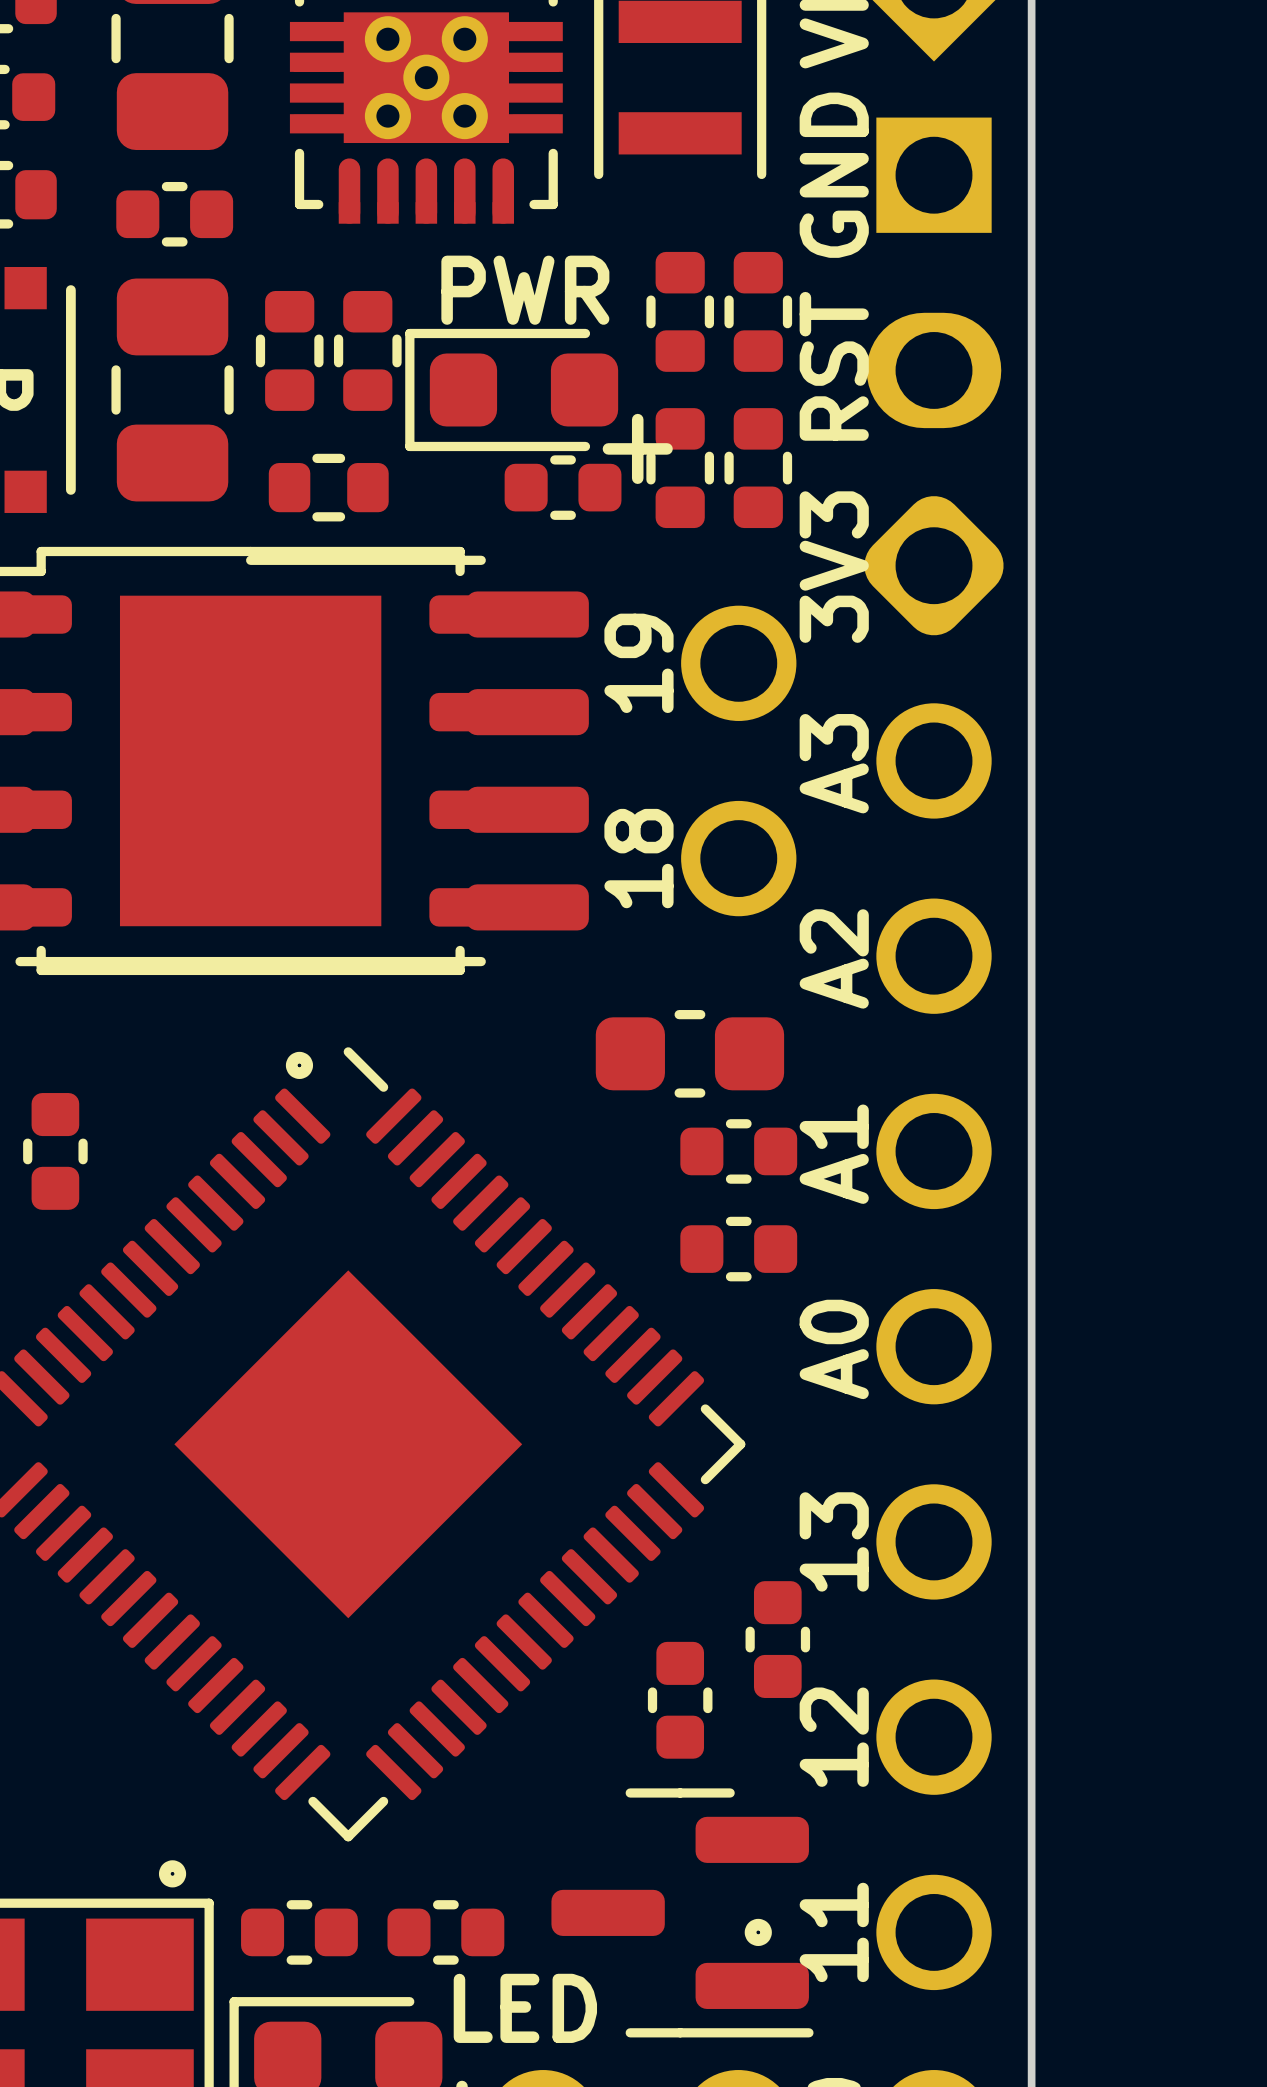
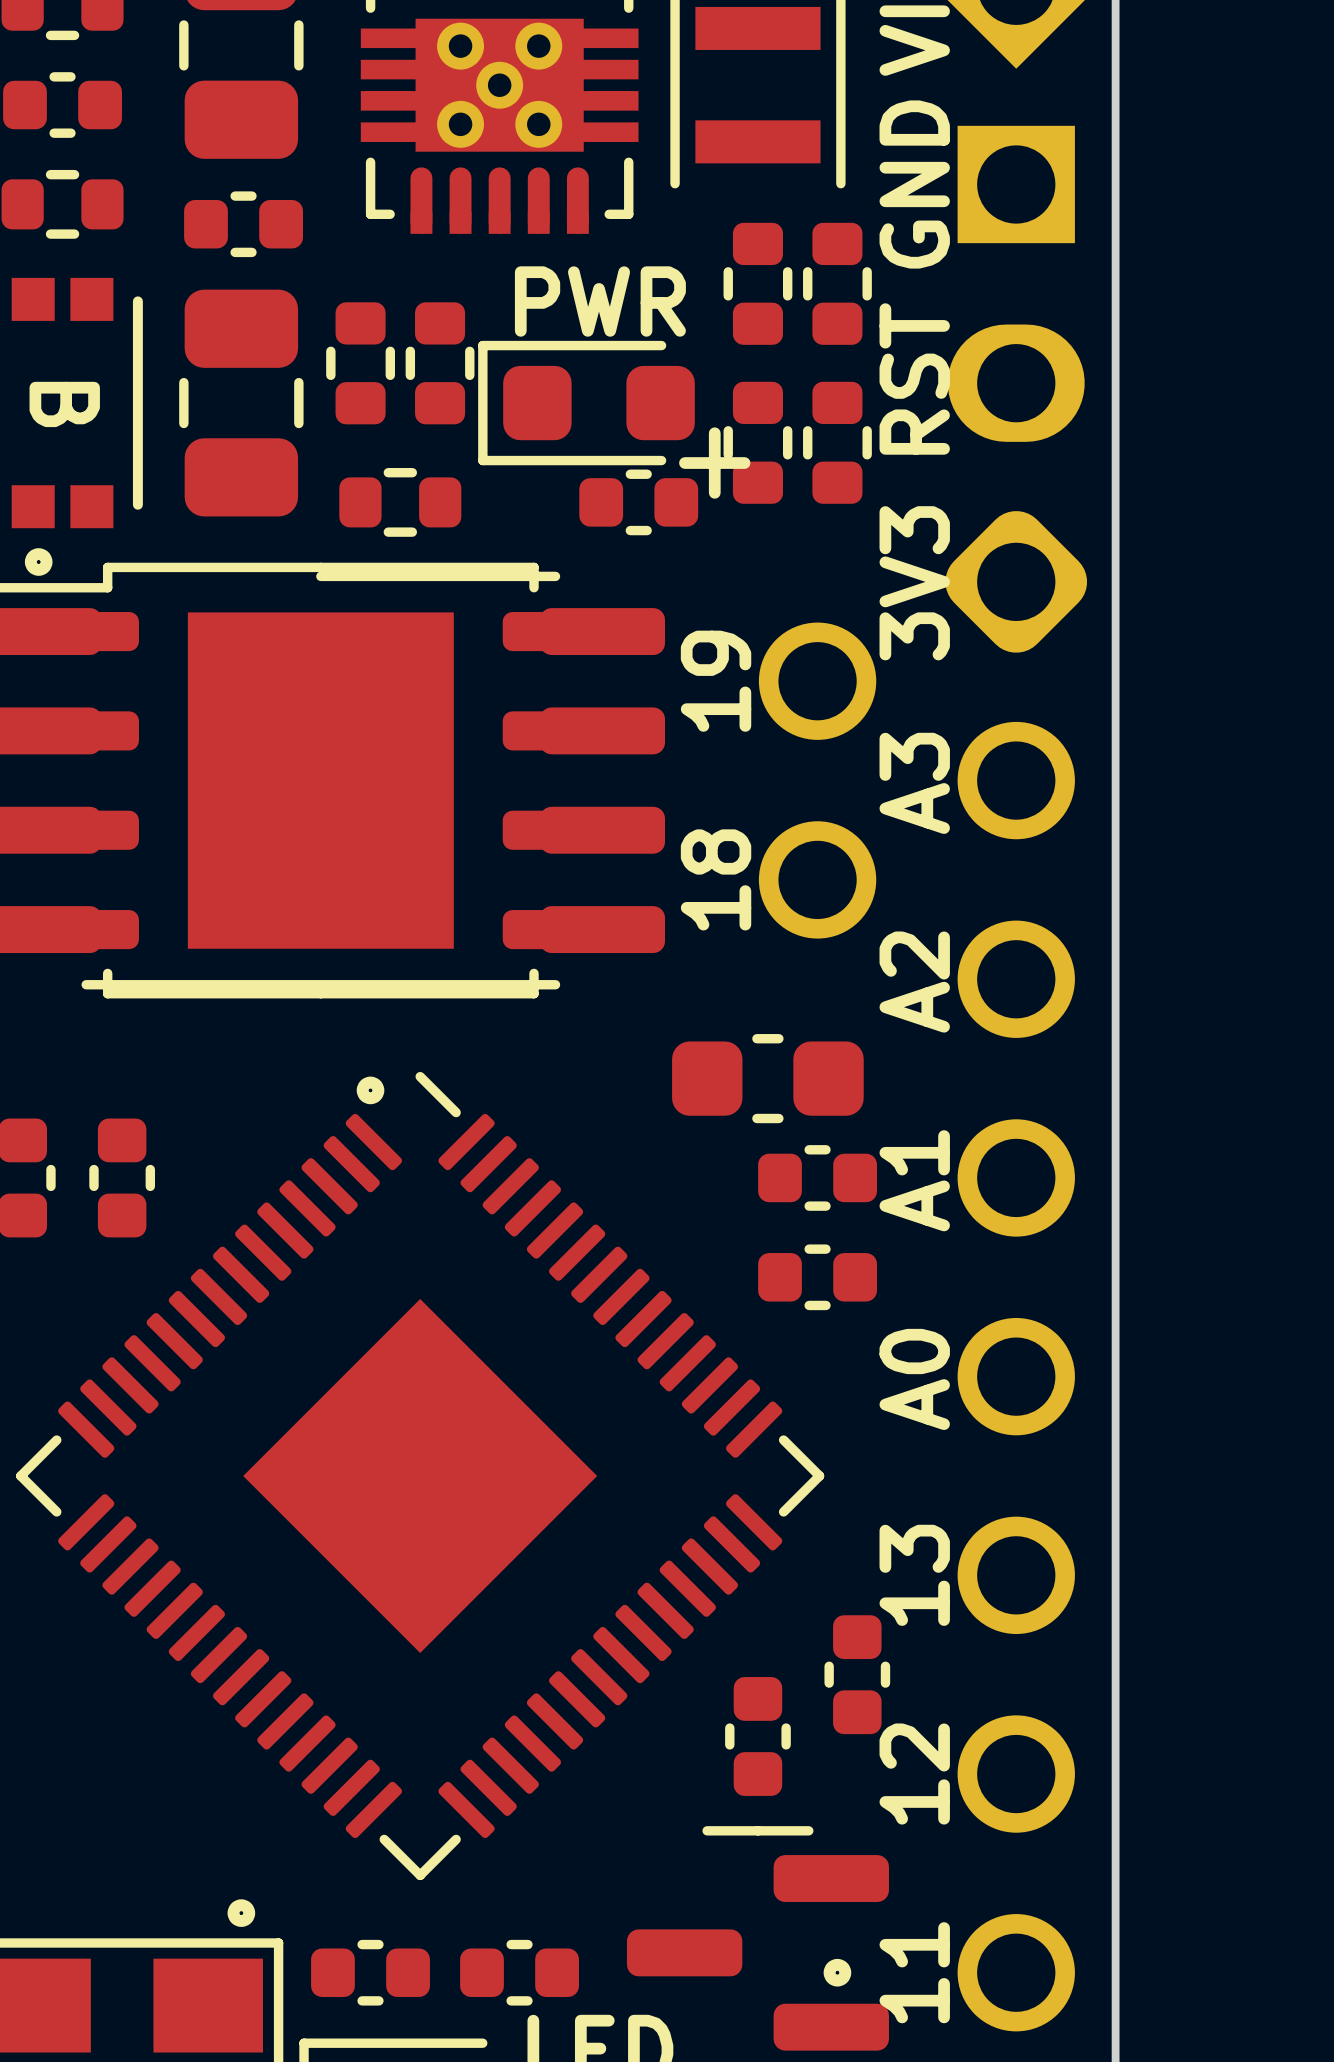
part position: (680, 311) -> (757, 283)
part position: (758, 311) -> (837, 283)
part position: (680, 468) -> (757, 442)
part position: (758, 468) -> (837, 442)

